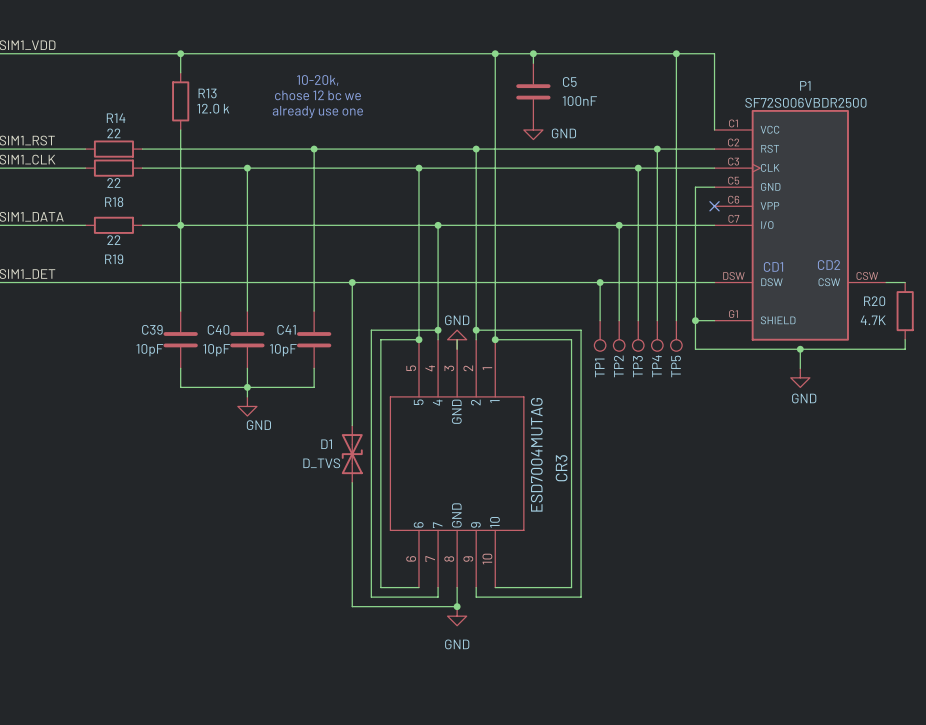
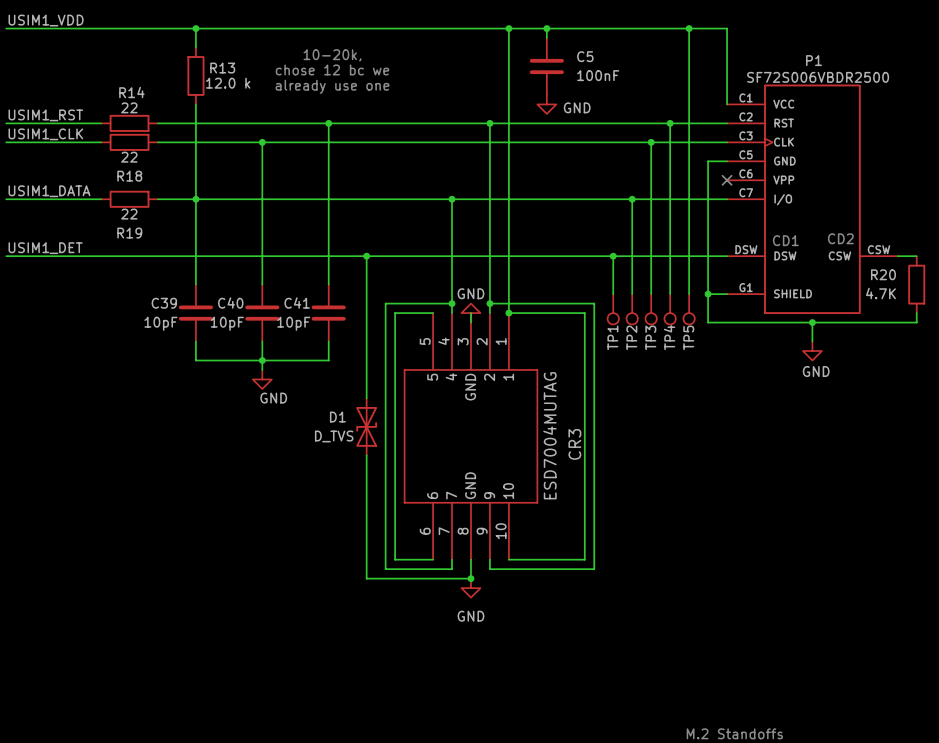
wire: (419, 168) (419, 339) -> none
junction: (419, 168) -> none
junction: (419, 339) -> none

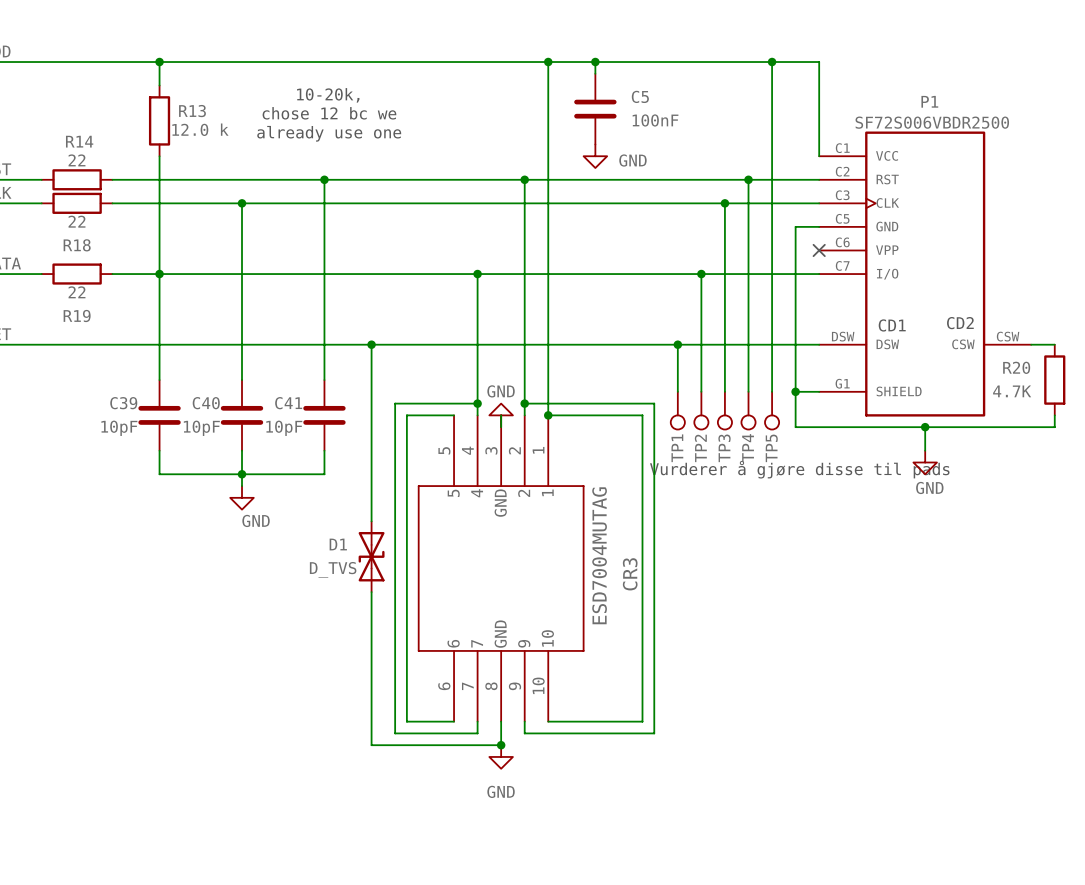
text: none -> Vurderer å gjøre disse til pads (799, 469)

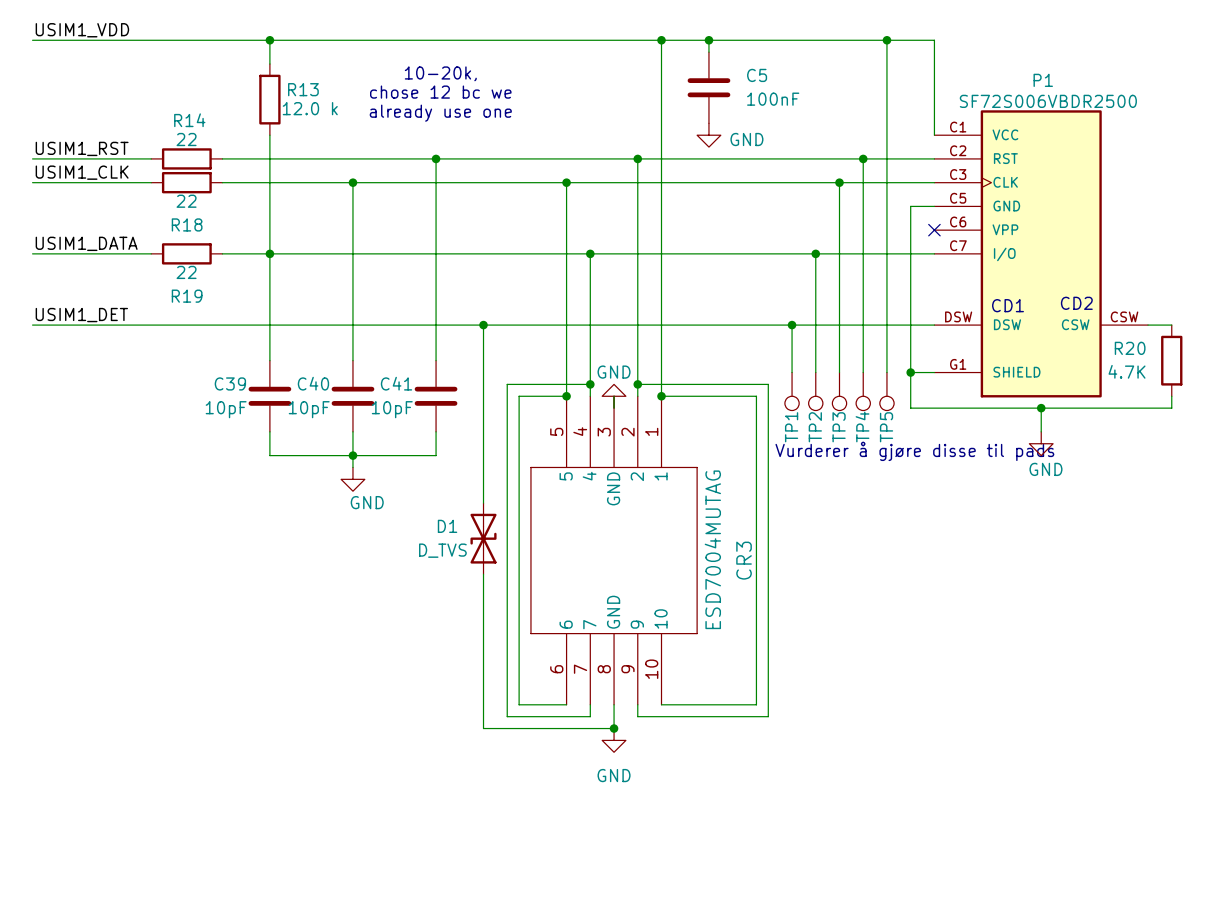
wire: none -> (566, 182) (566, 396)
junction: none -> (566, 182)
junction: none -> (566, 396)

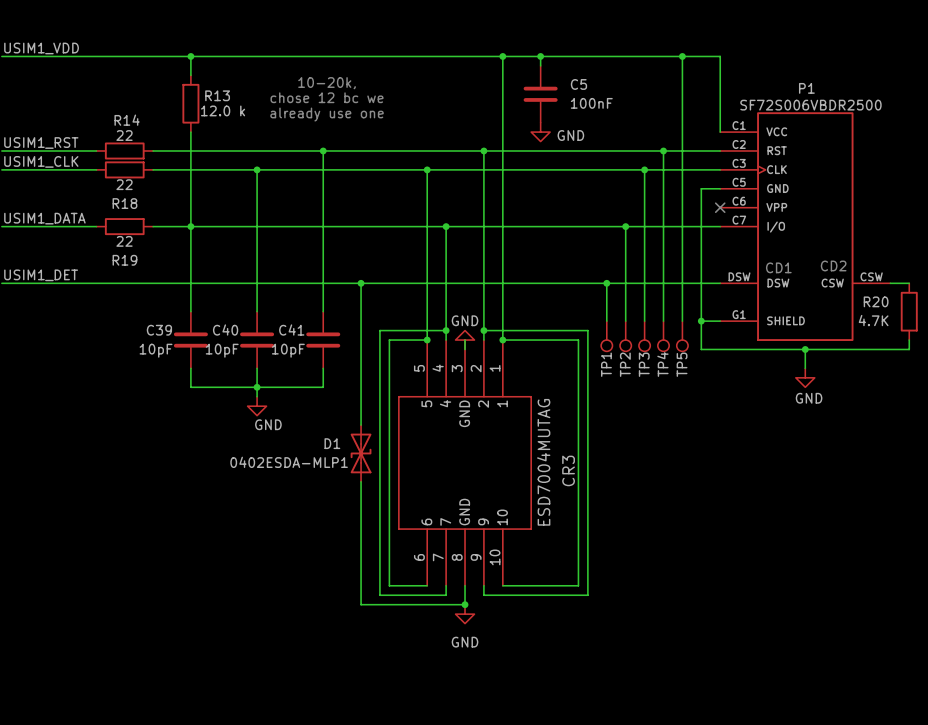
text: Vurderer å gjøre disse til pads (914, 451) -> none
D1 value: D_TVS (442, 550) -> 0402ESDA-MLP1 (289, 462)

